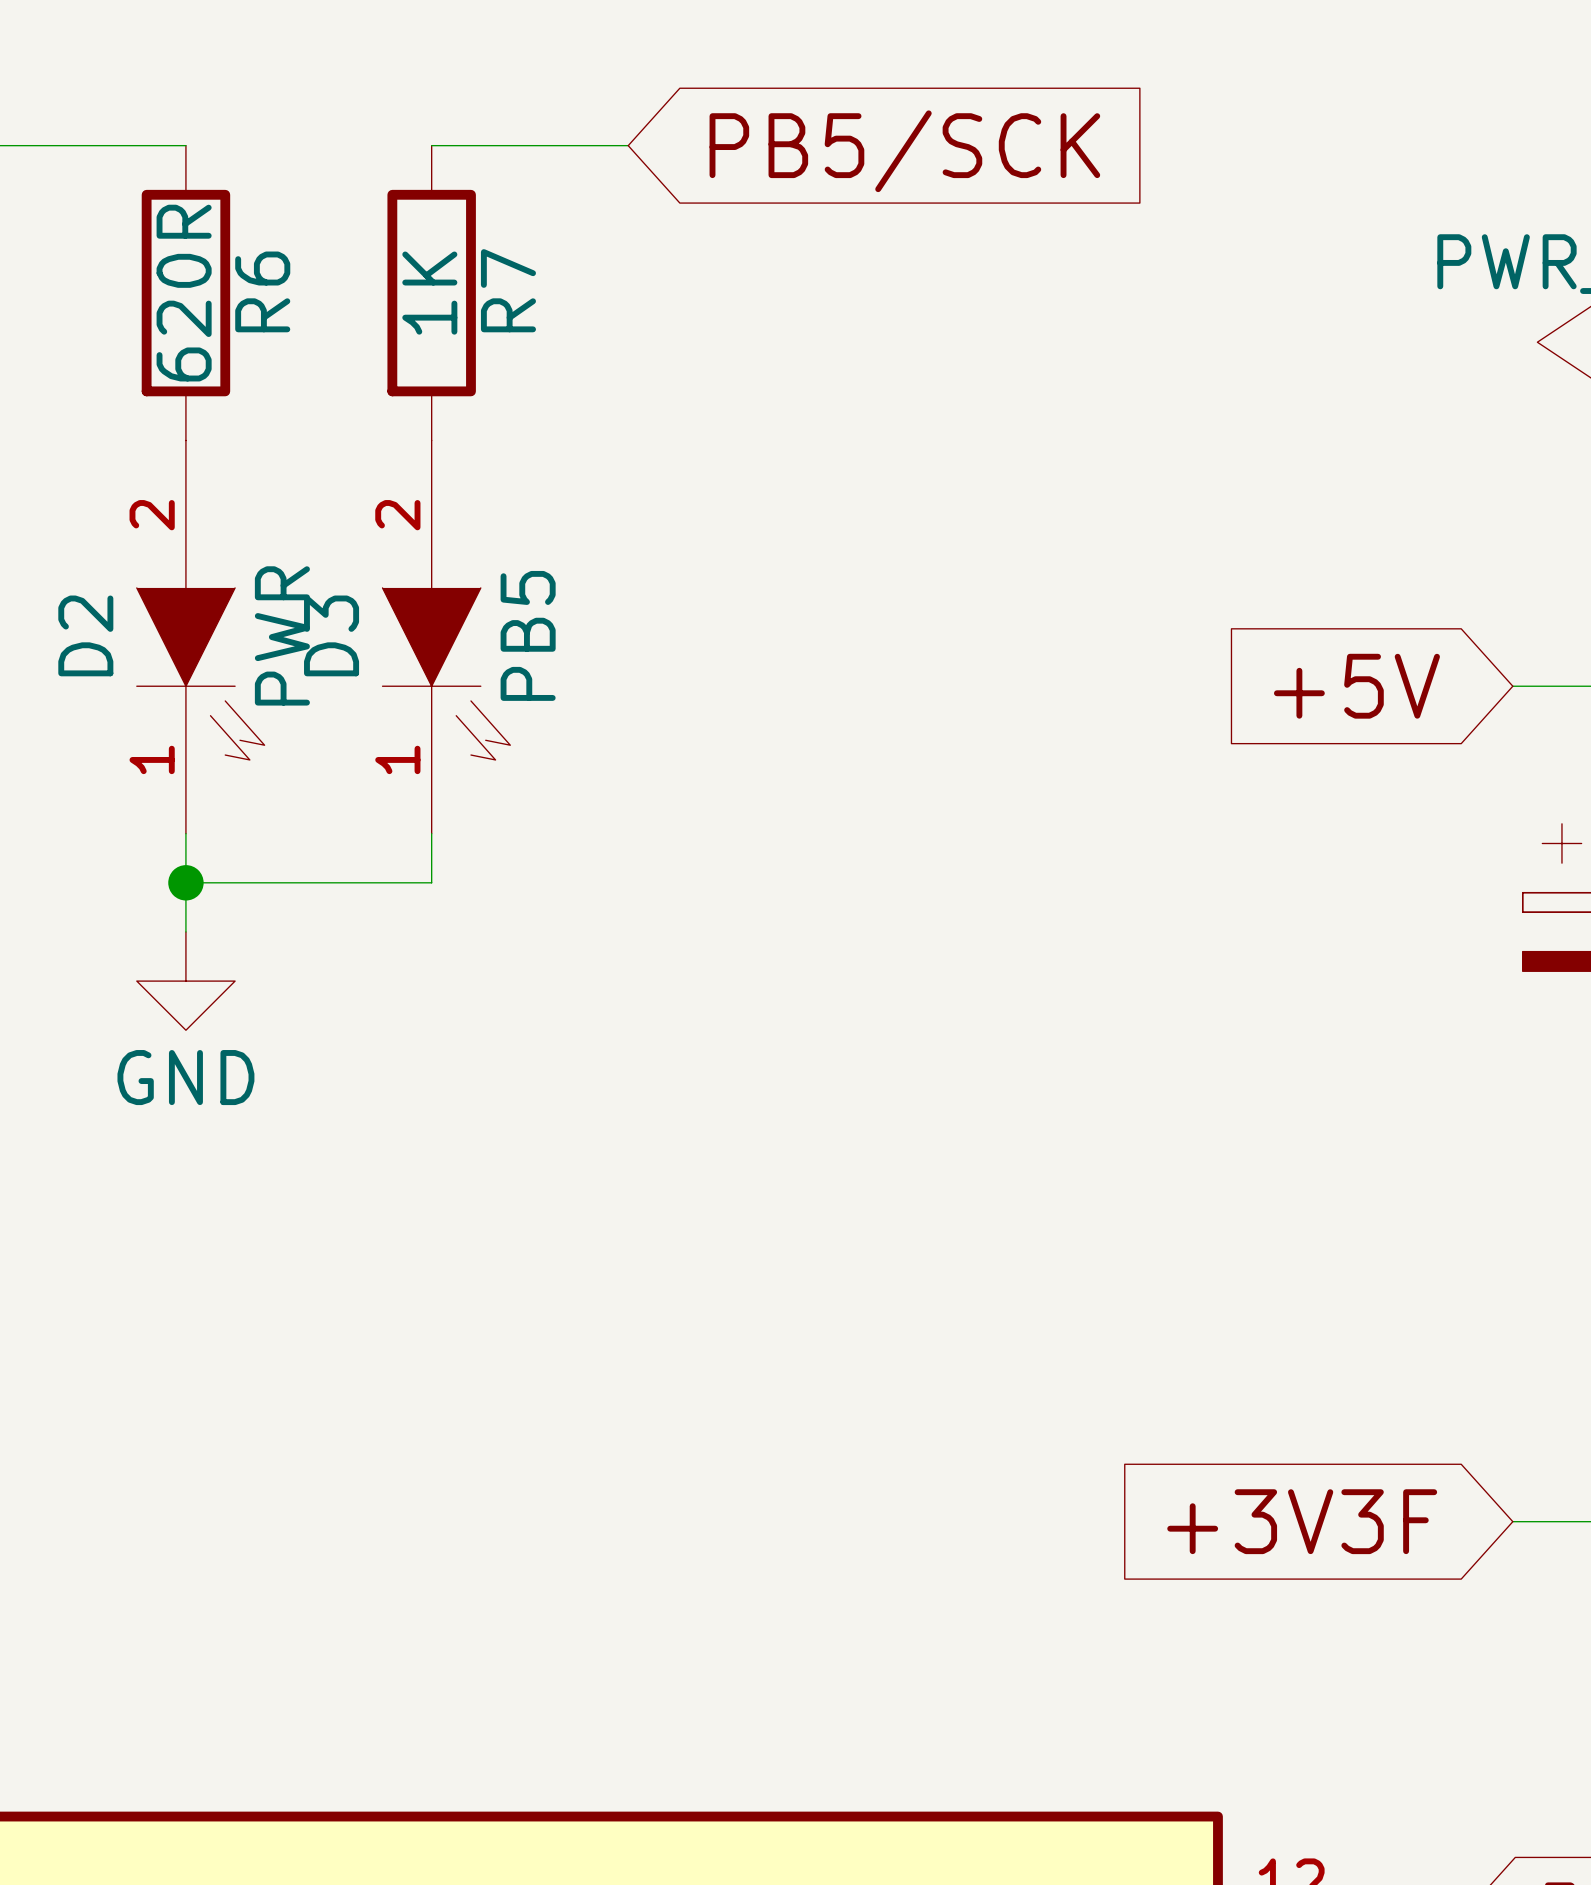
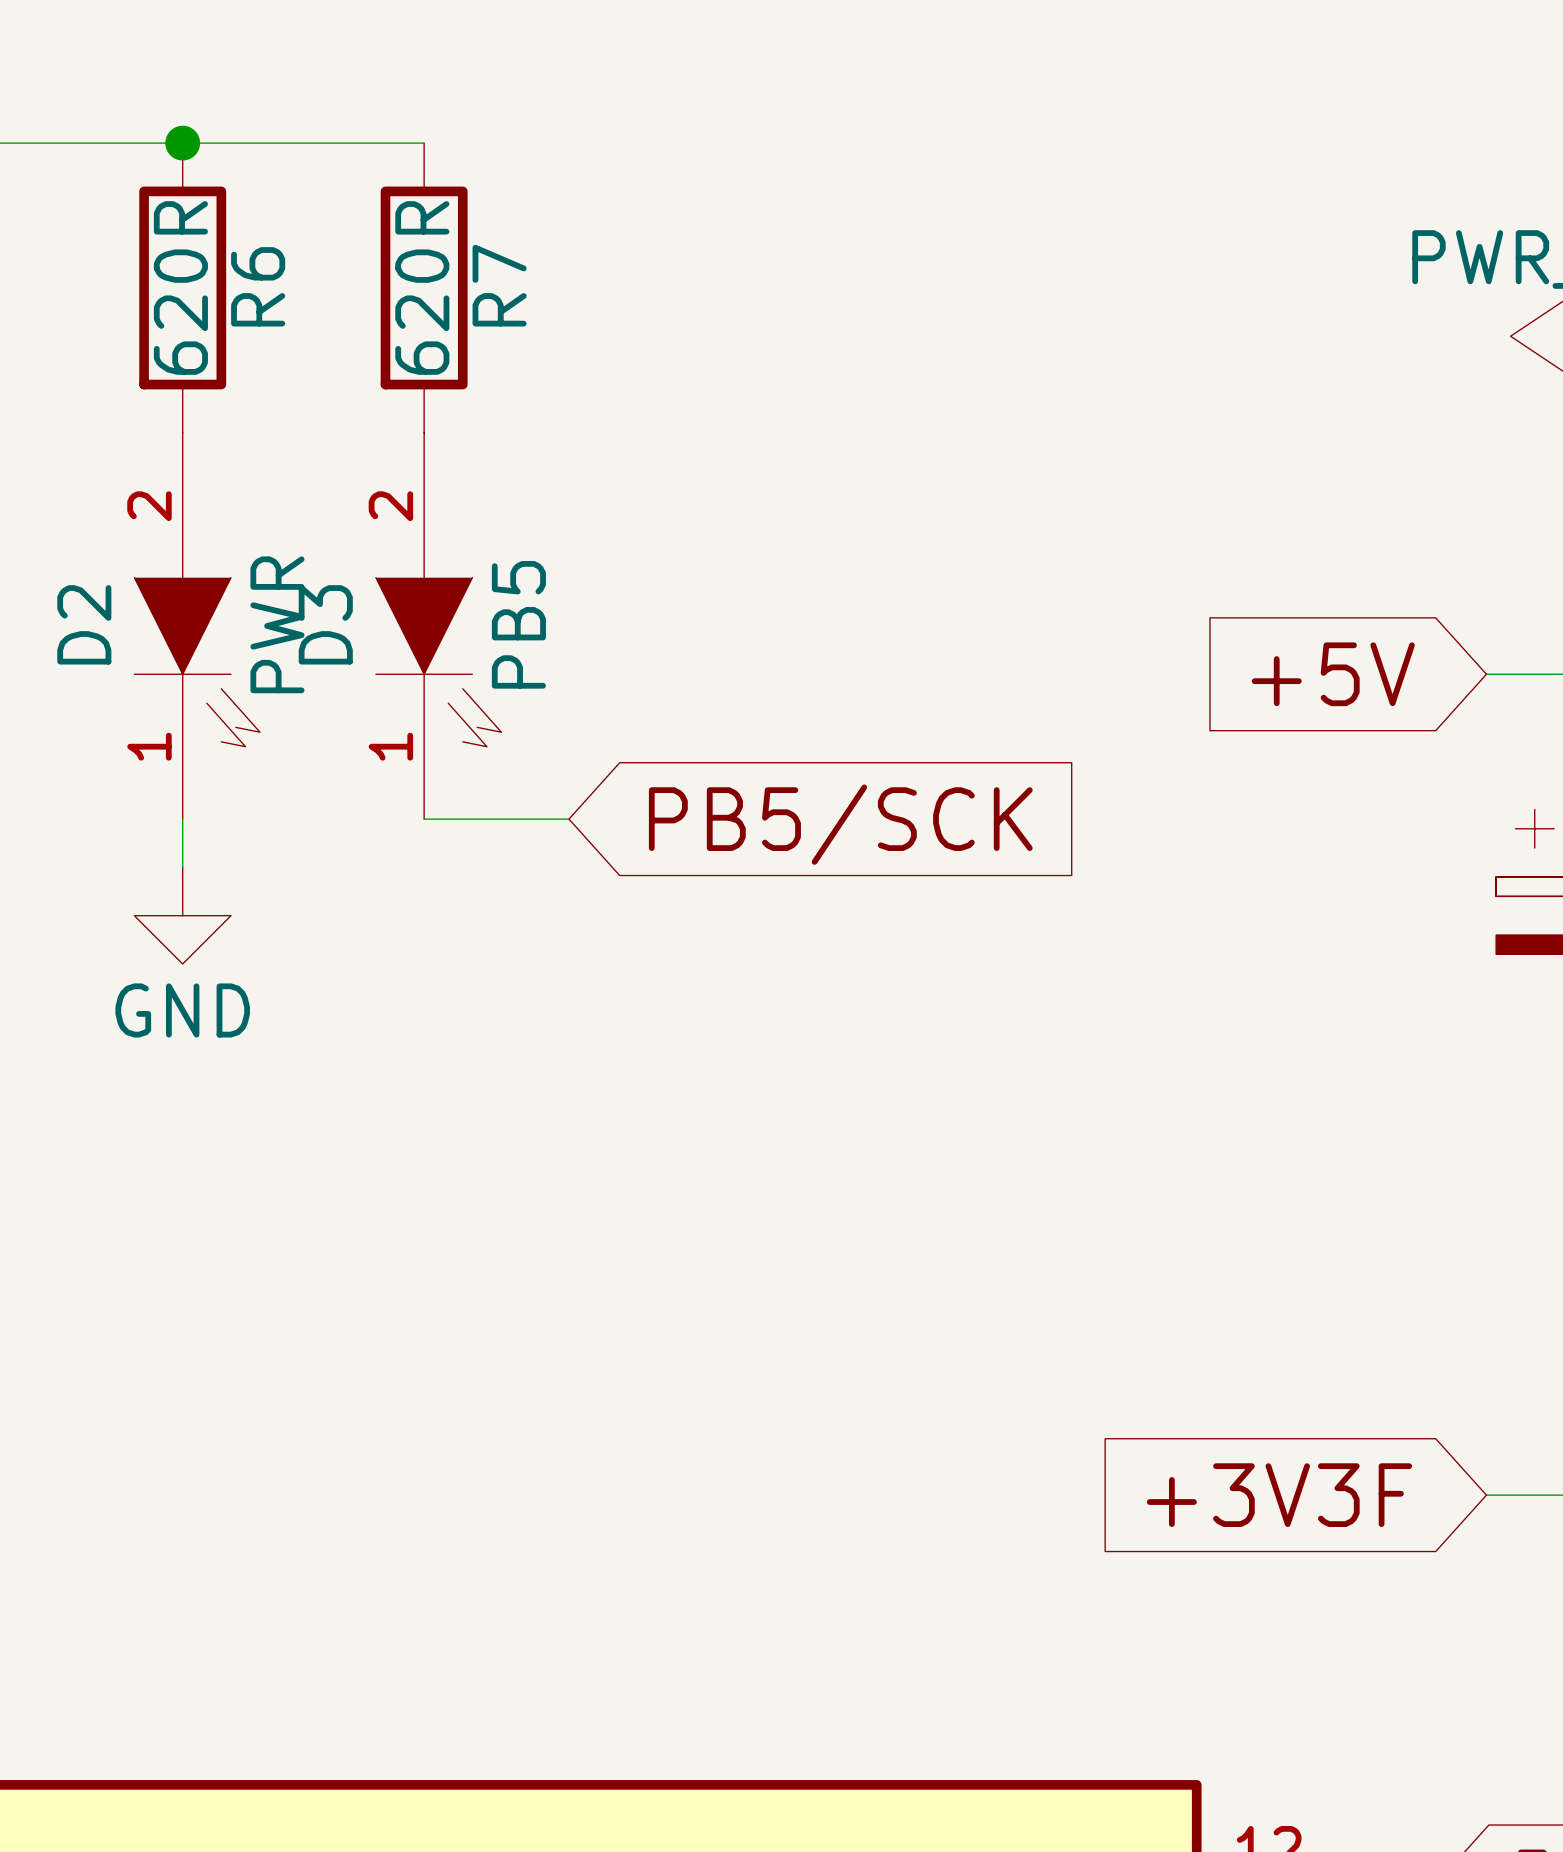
junction: none -> (182, 143)
wire: (431, 145) (628, 145) -> (424, 143) (182, 143)
global label position: PB5/SCK (904, 151) -> PB5/SCK (840, 824)
R7 value: 1K (429, 293) -> 620R (422, 287)
wire: (431, 833) (431, 882) (185, 882) (185, 931) -> (424, 819) (568, 819)
junction: (185, 882) -> none
power symbol position: GND (185, 981) -> GND (182, 915)

